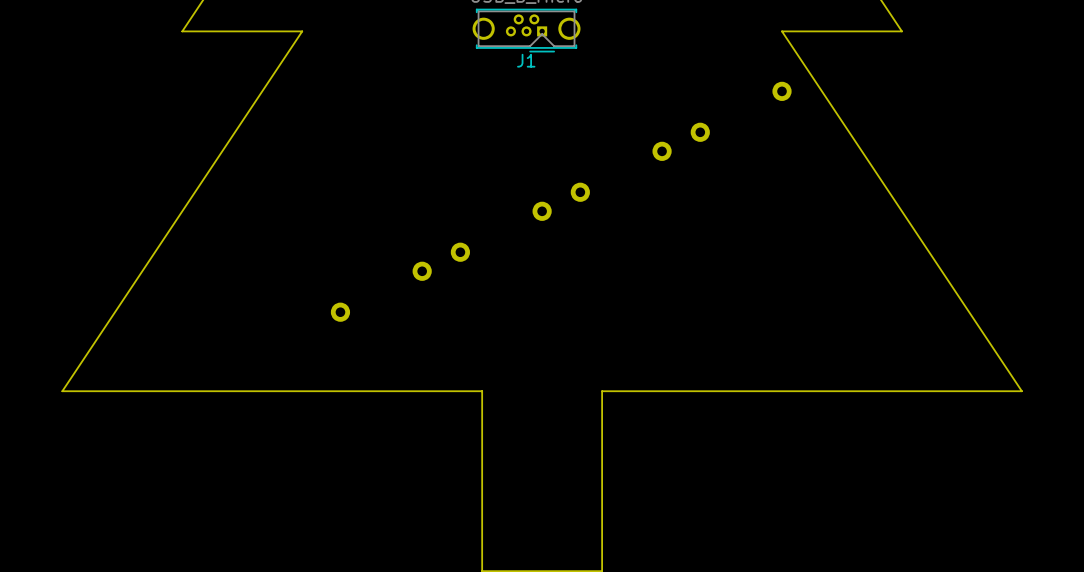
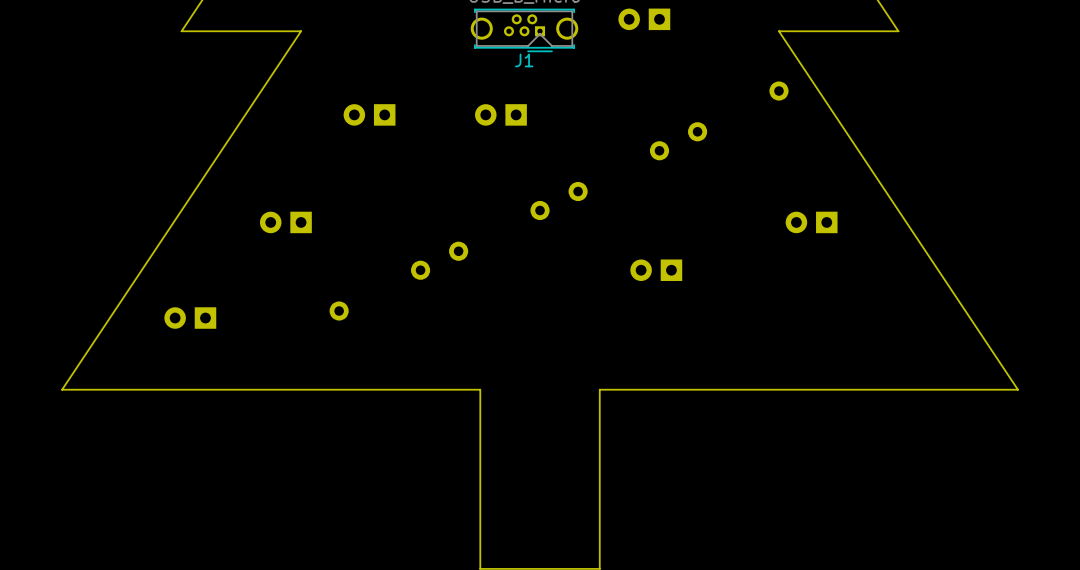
part: none -> (644, 19)
part: none -> (369, 114)
part: none -> (500, 114)
part: none -> (285, 222)
part: none -> (811, 222)
part: none -> (656, 270)
part: none -> (190, 318)

